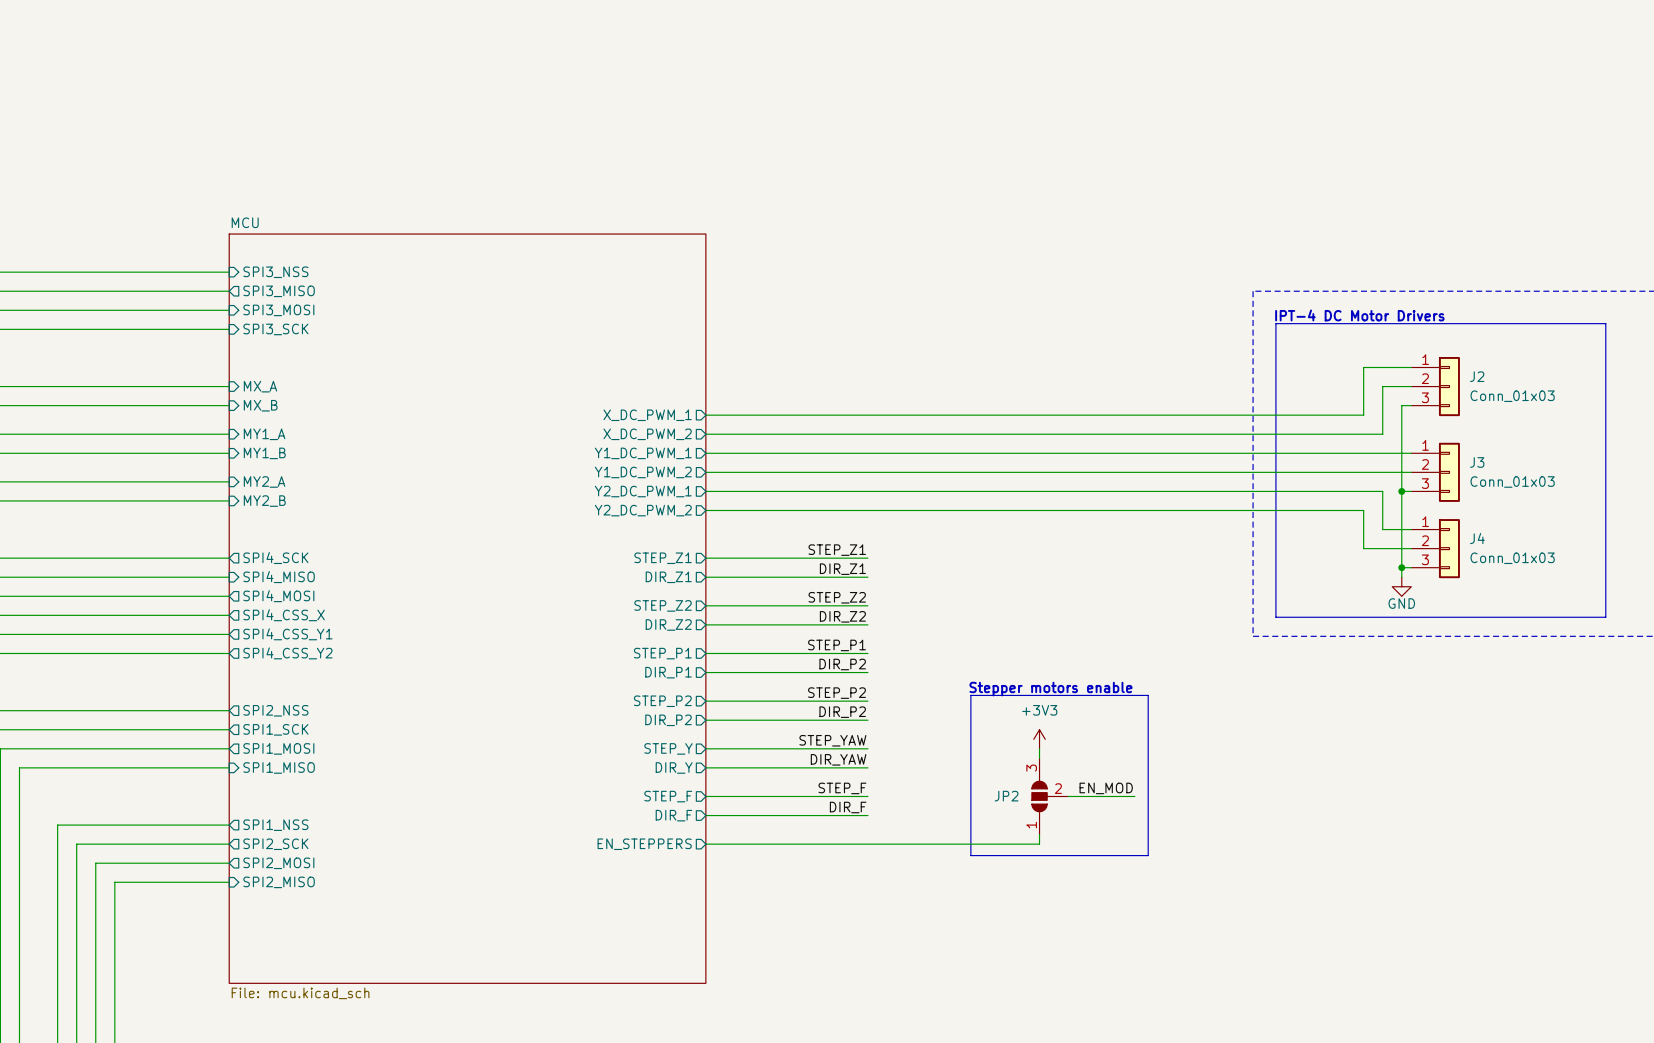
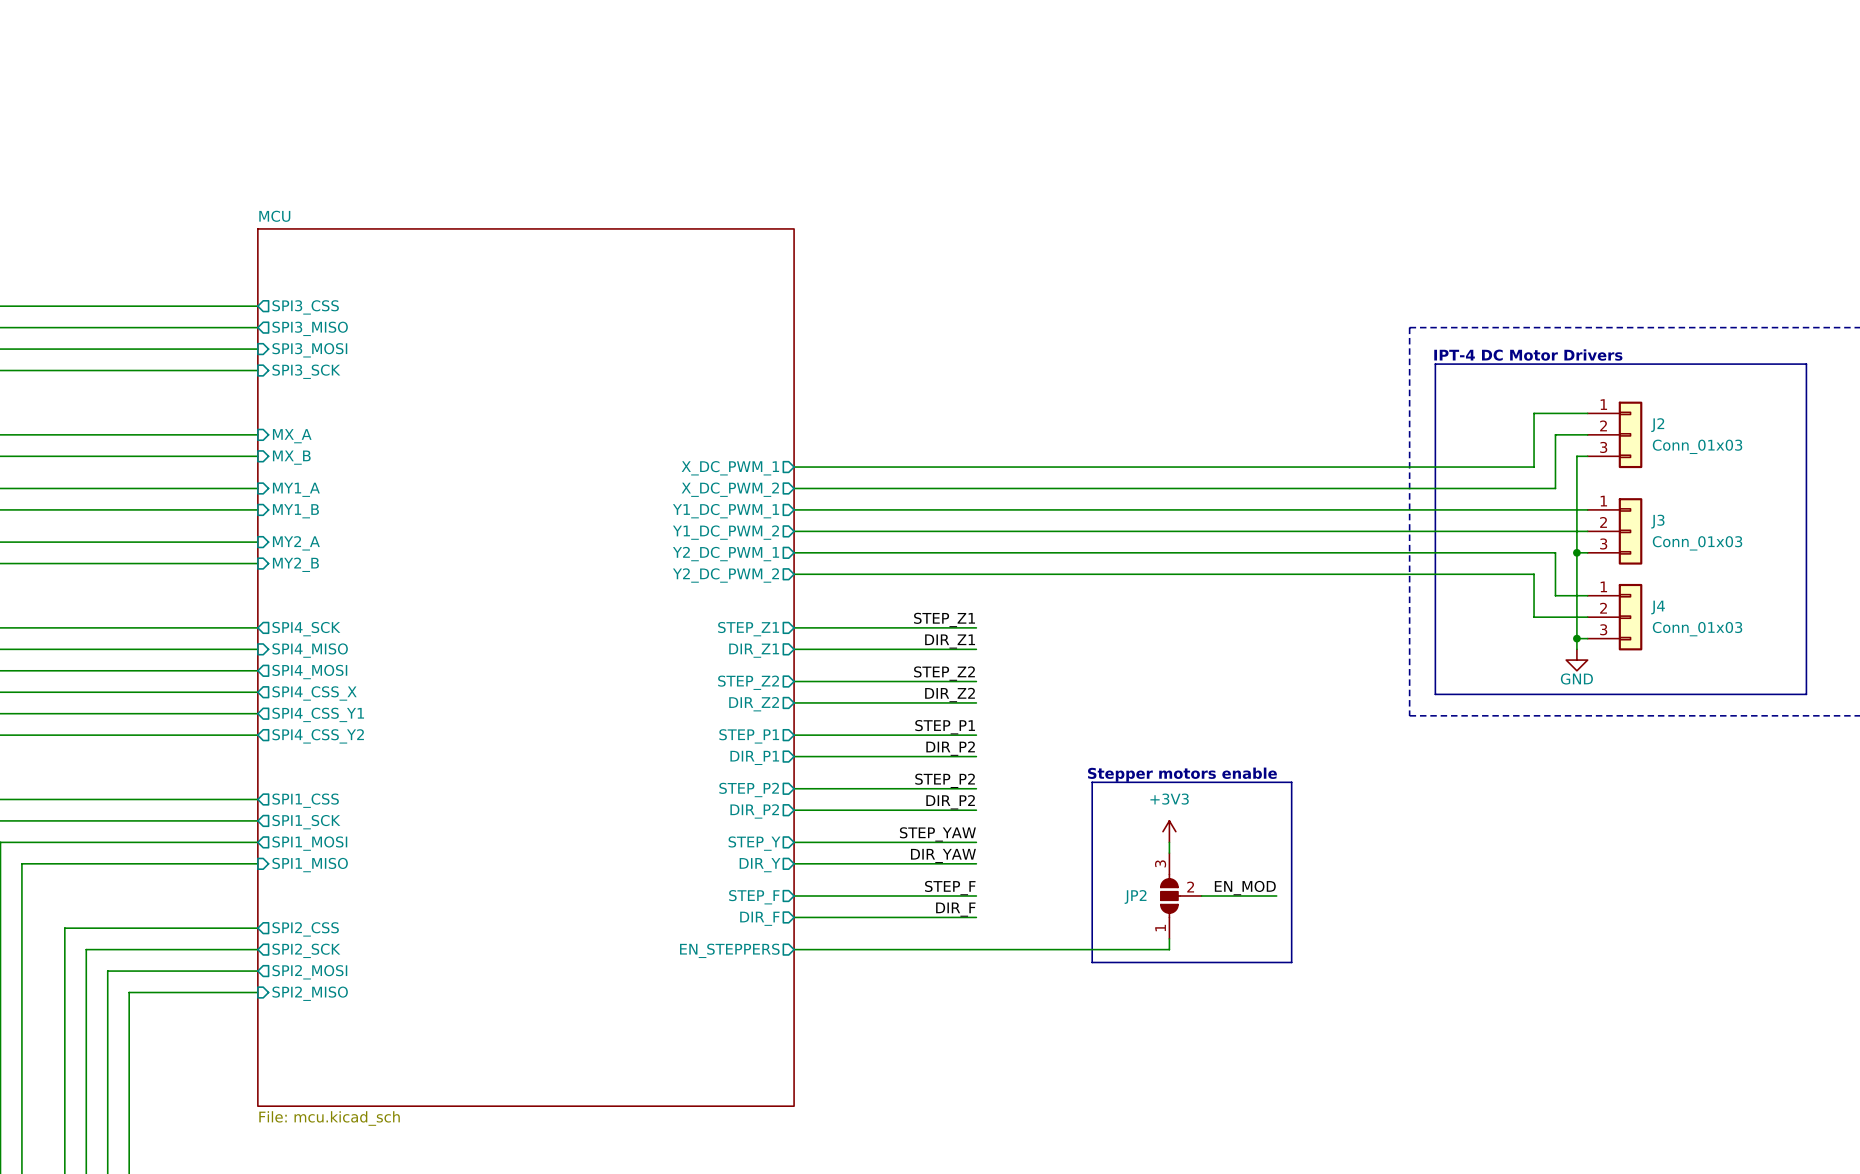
sheet pin shape: input (275, 272) -> output (305, 307)
sheet pin: SPI3_NSS (275, 272) -> SPI3_CSS (305, 307)
sheet MCU: none -> File: mcu.kicad_sch (525, 667)
sheet MCU: File: mcu.kicad_sch (467, 608) -> none
sheet pin: SPI2_NSS (275, 710) -> SPI1_CSS (305, 800)
sheet pin: SPI1_NSS (275, 825) -> SPI2_CSS (305, 929)

